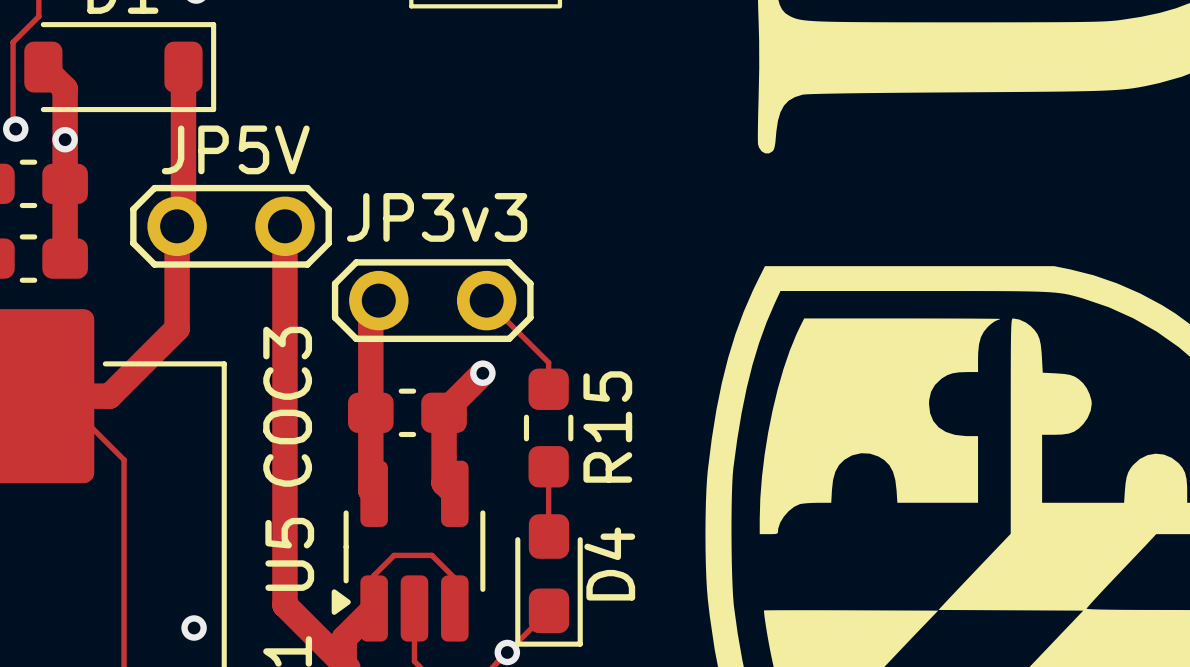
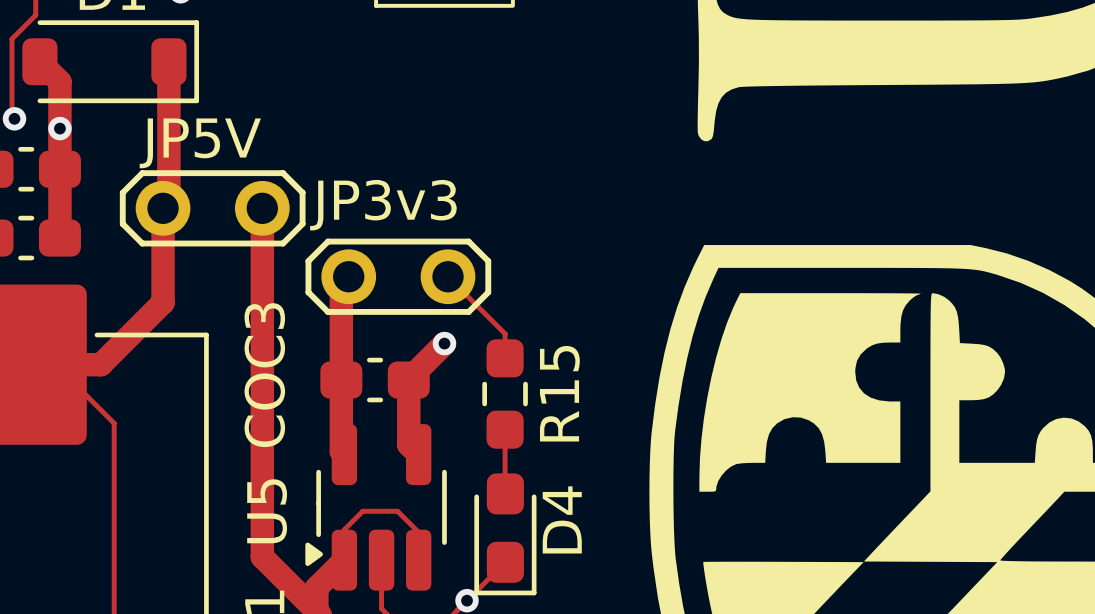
via: (194, 628) -> none

